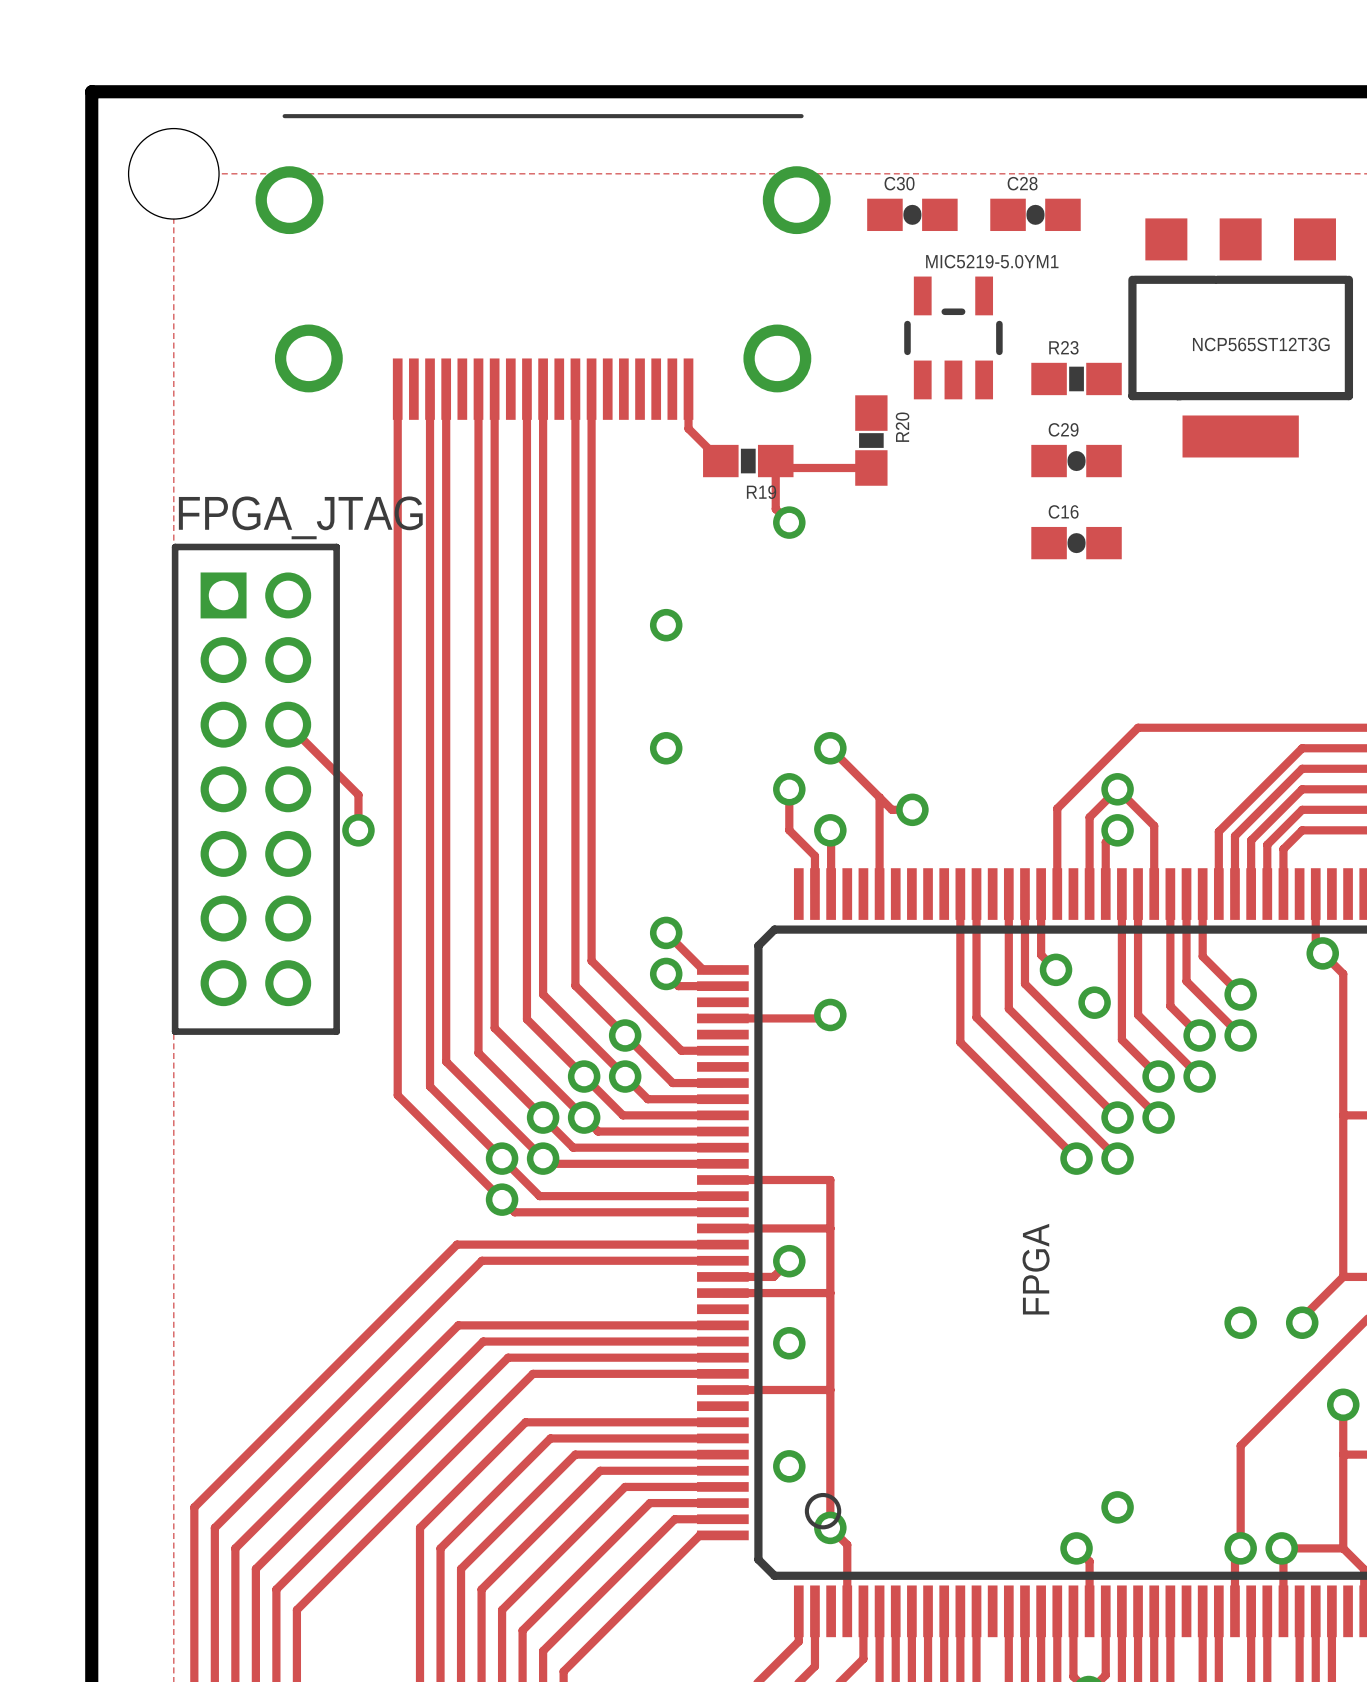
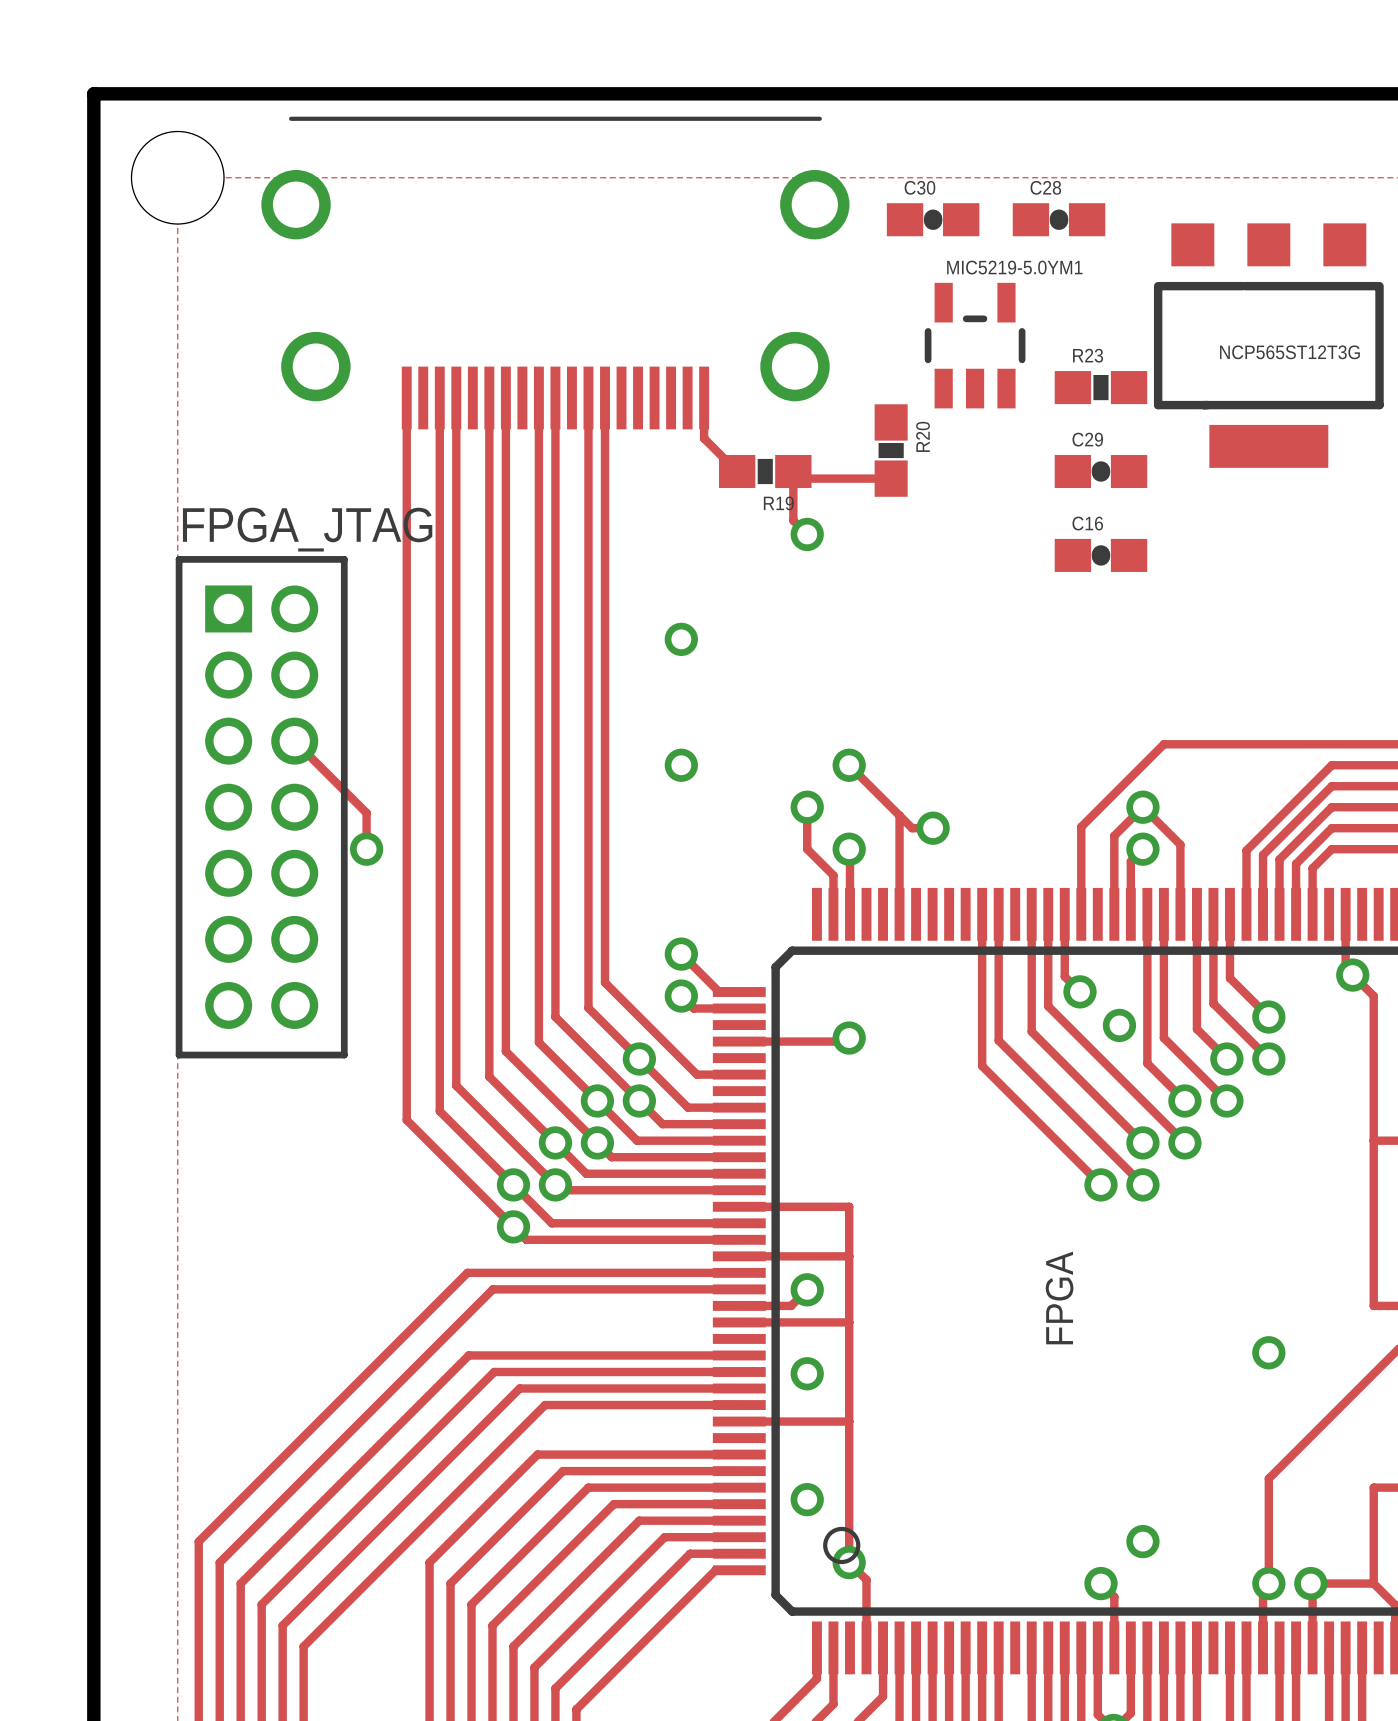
track: (1343, 1276) (1302, 1317) (1302, 1322) -> none
via: (1302, 1322) -> none
track: (1343, 1404) (1343, 1454) -> none
via: (1343, 1404) -> none

